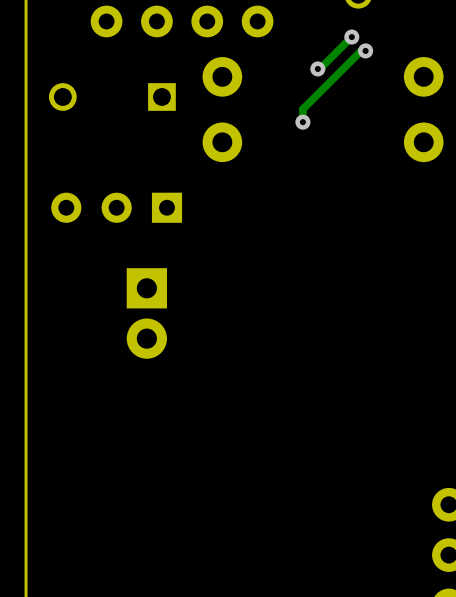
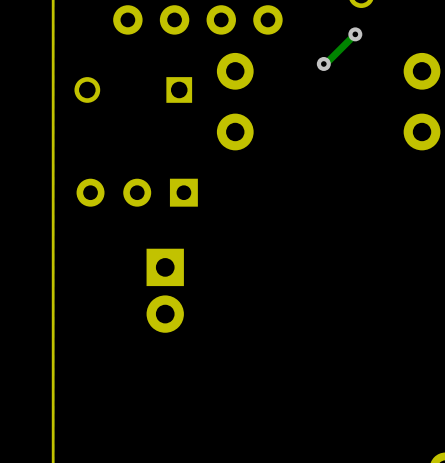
track: (365, 50) (361, 50) (302, 109) (302, 122) -> none
via: (365, 50) -> none
via: (302, 122) -> none

